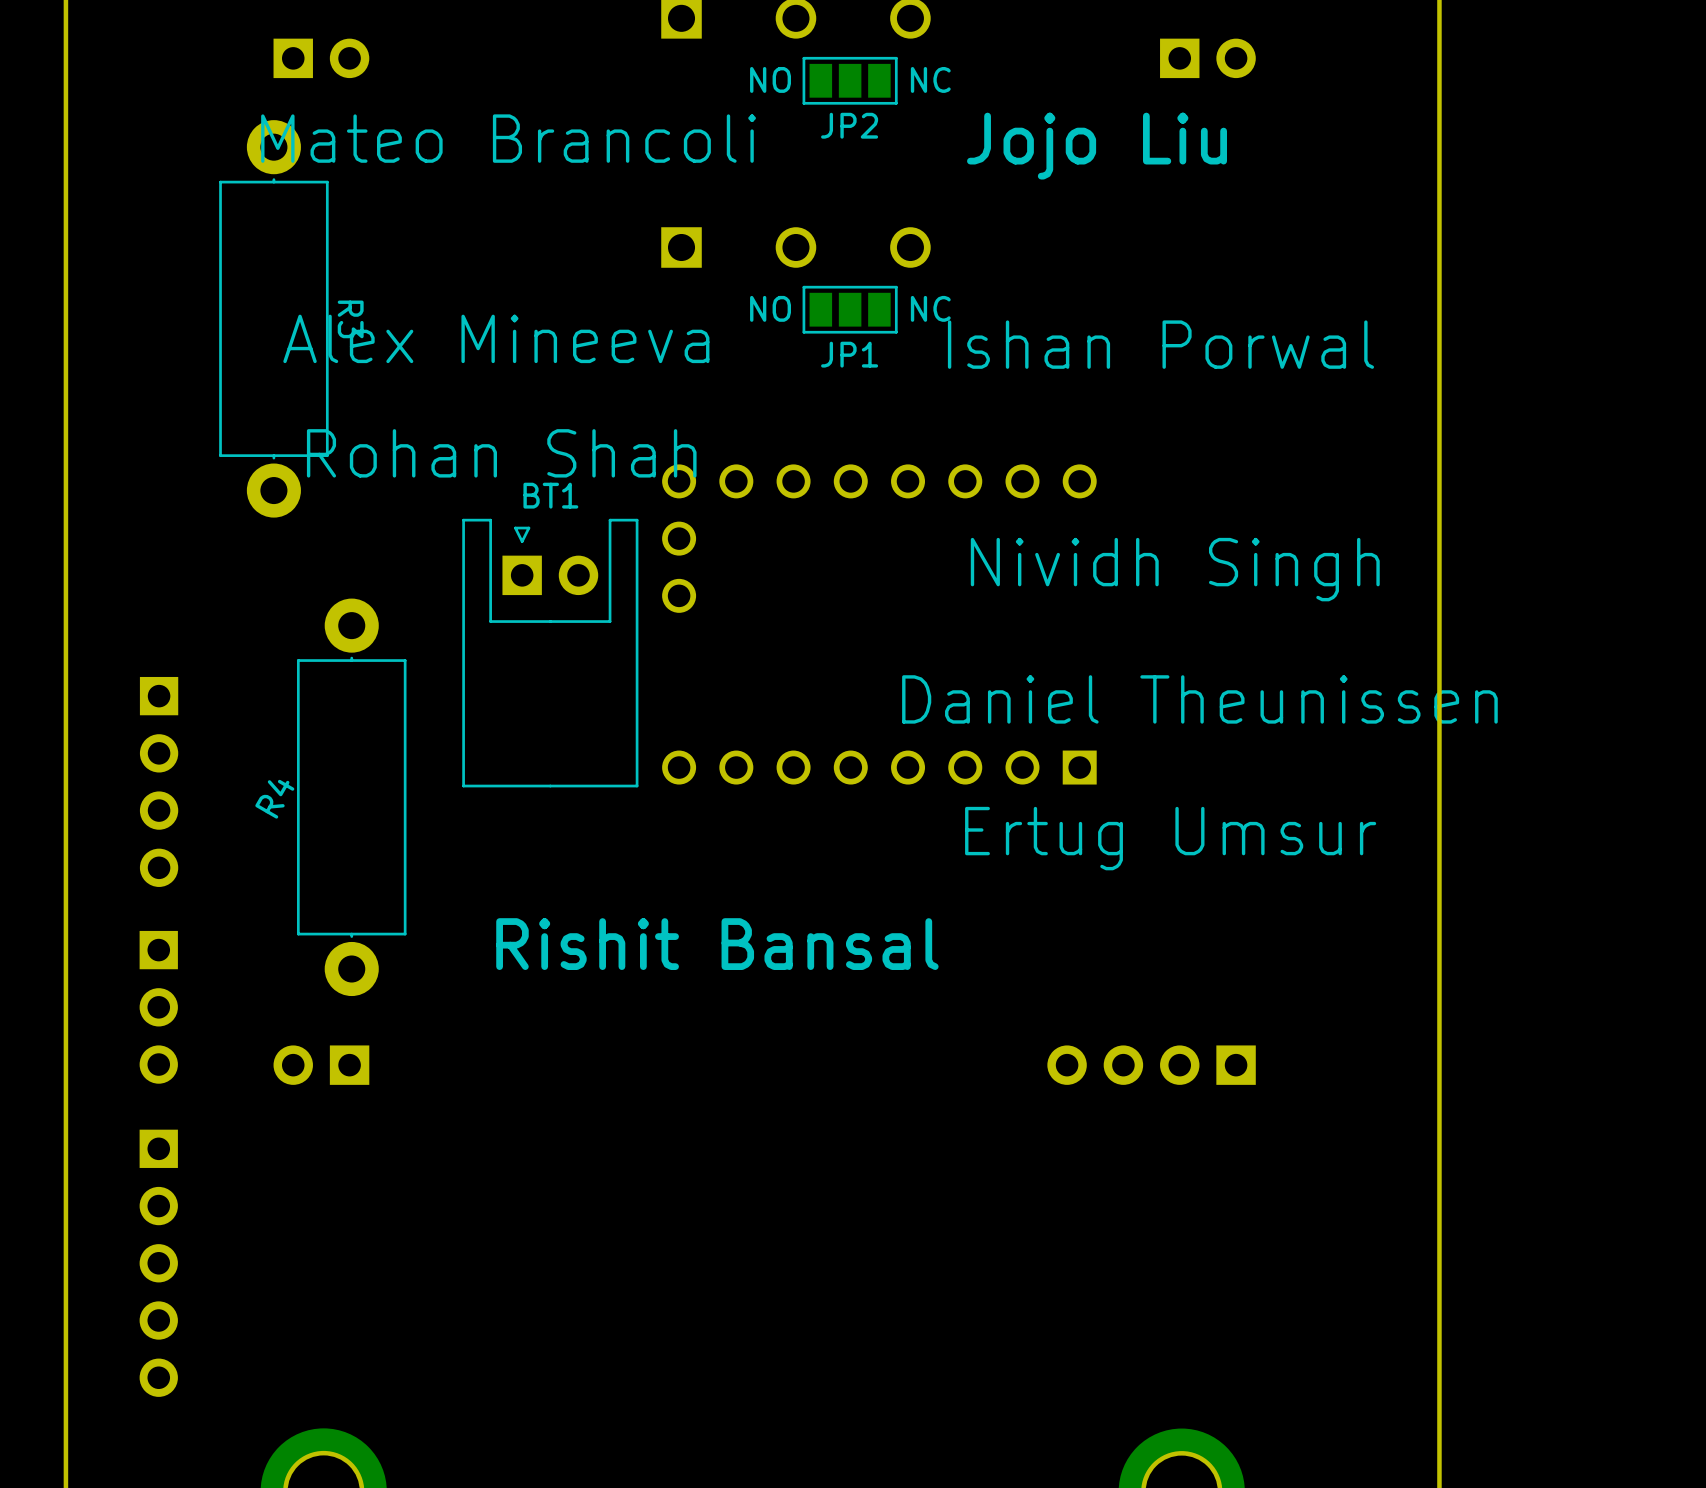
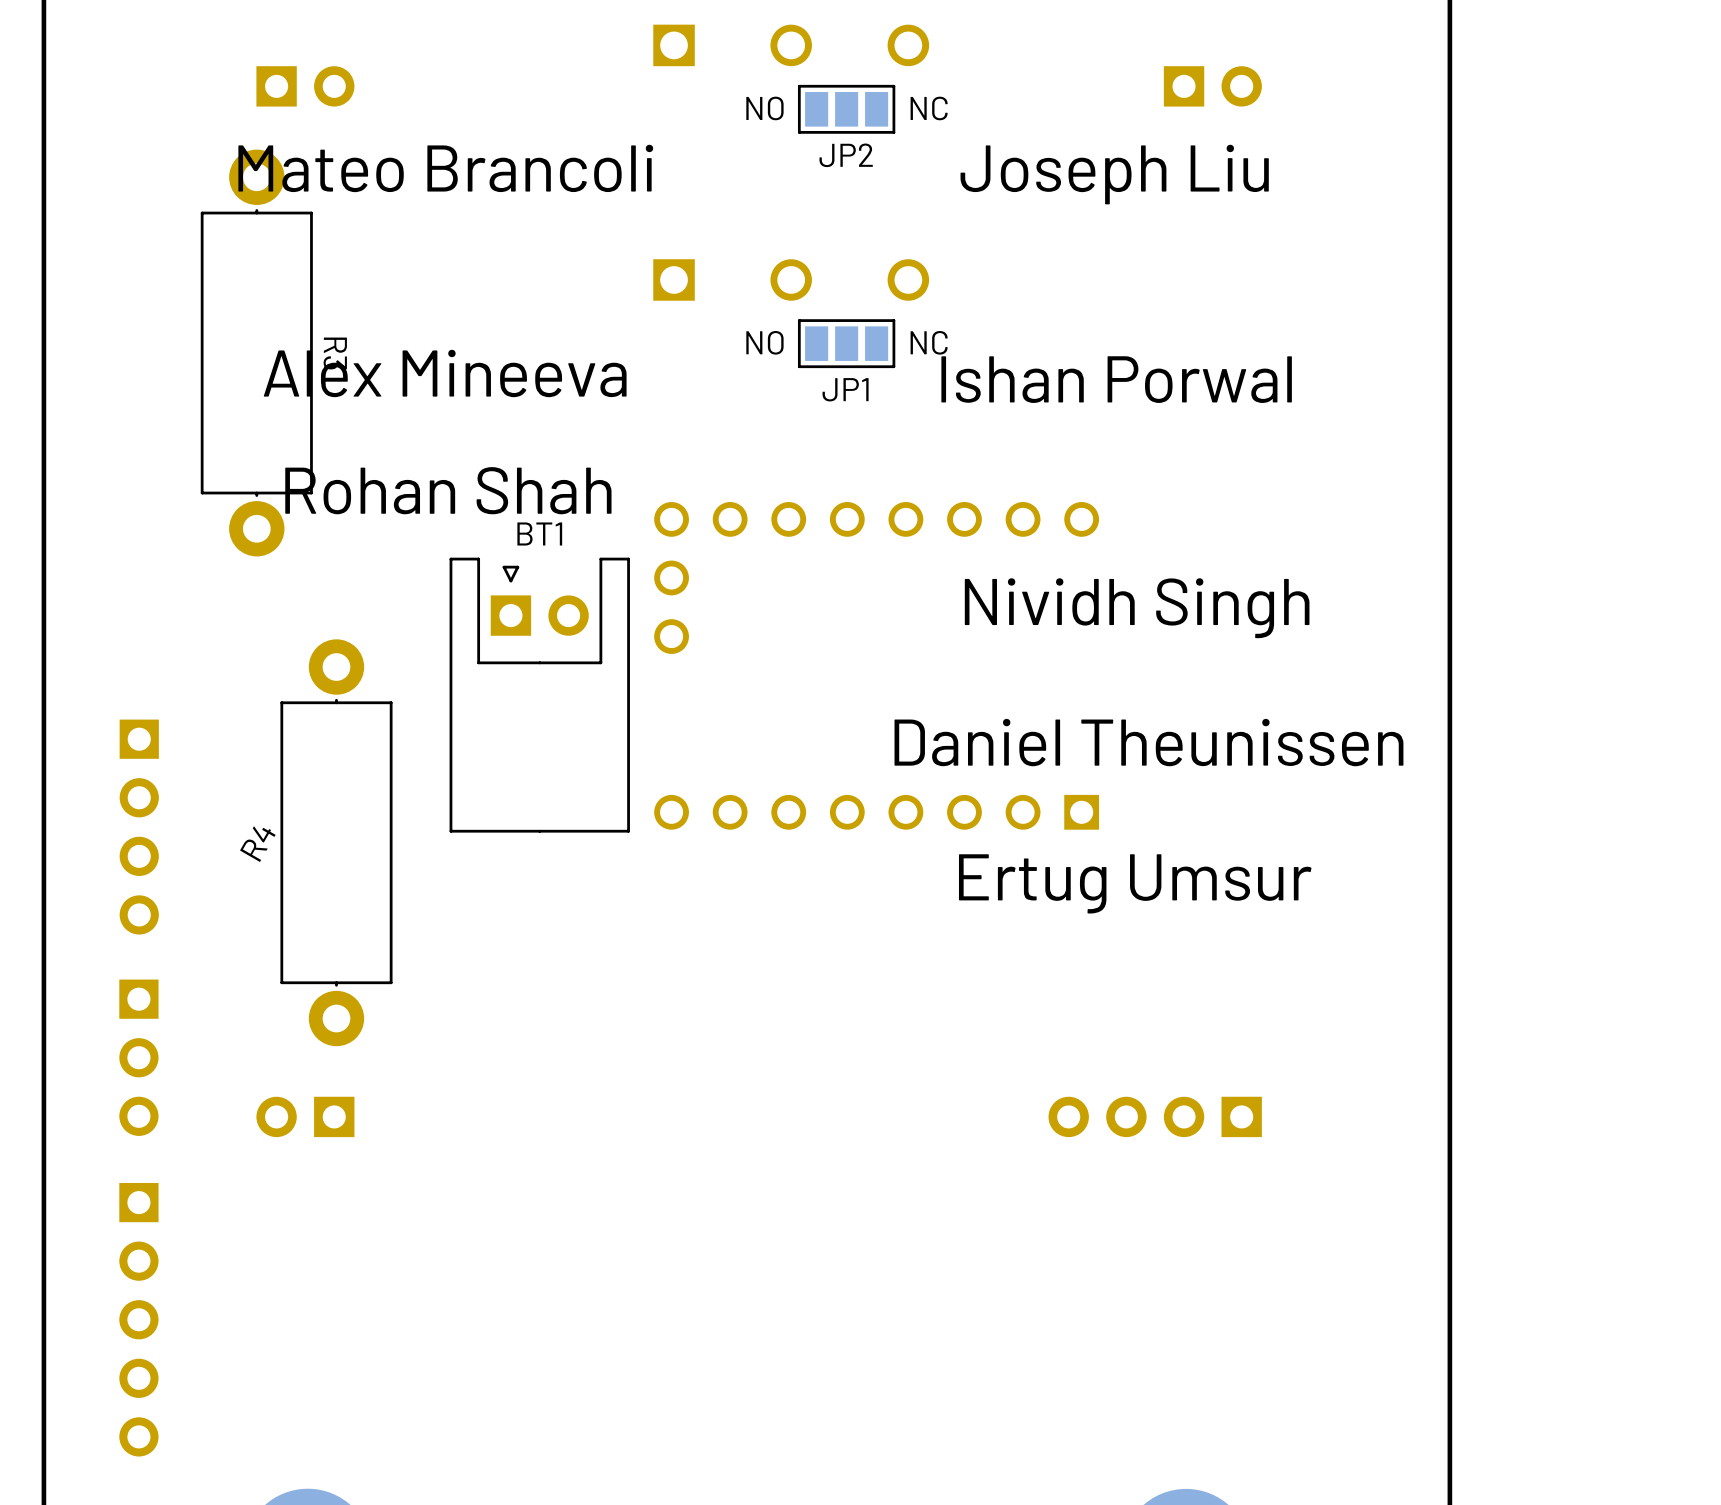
text: Jojo Liu (1097, 146) -> Joseph Liu (1114, 174)
text: Rishit Bansal (717, 944) -> none

